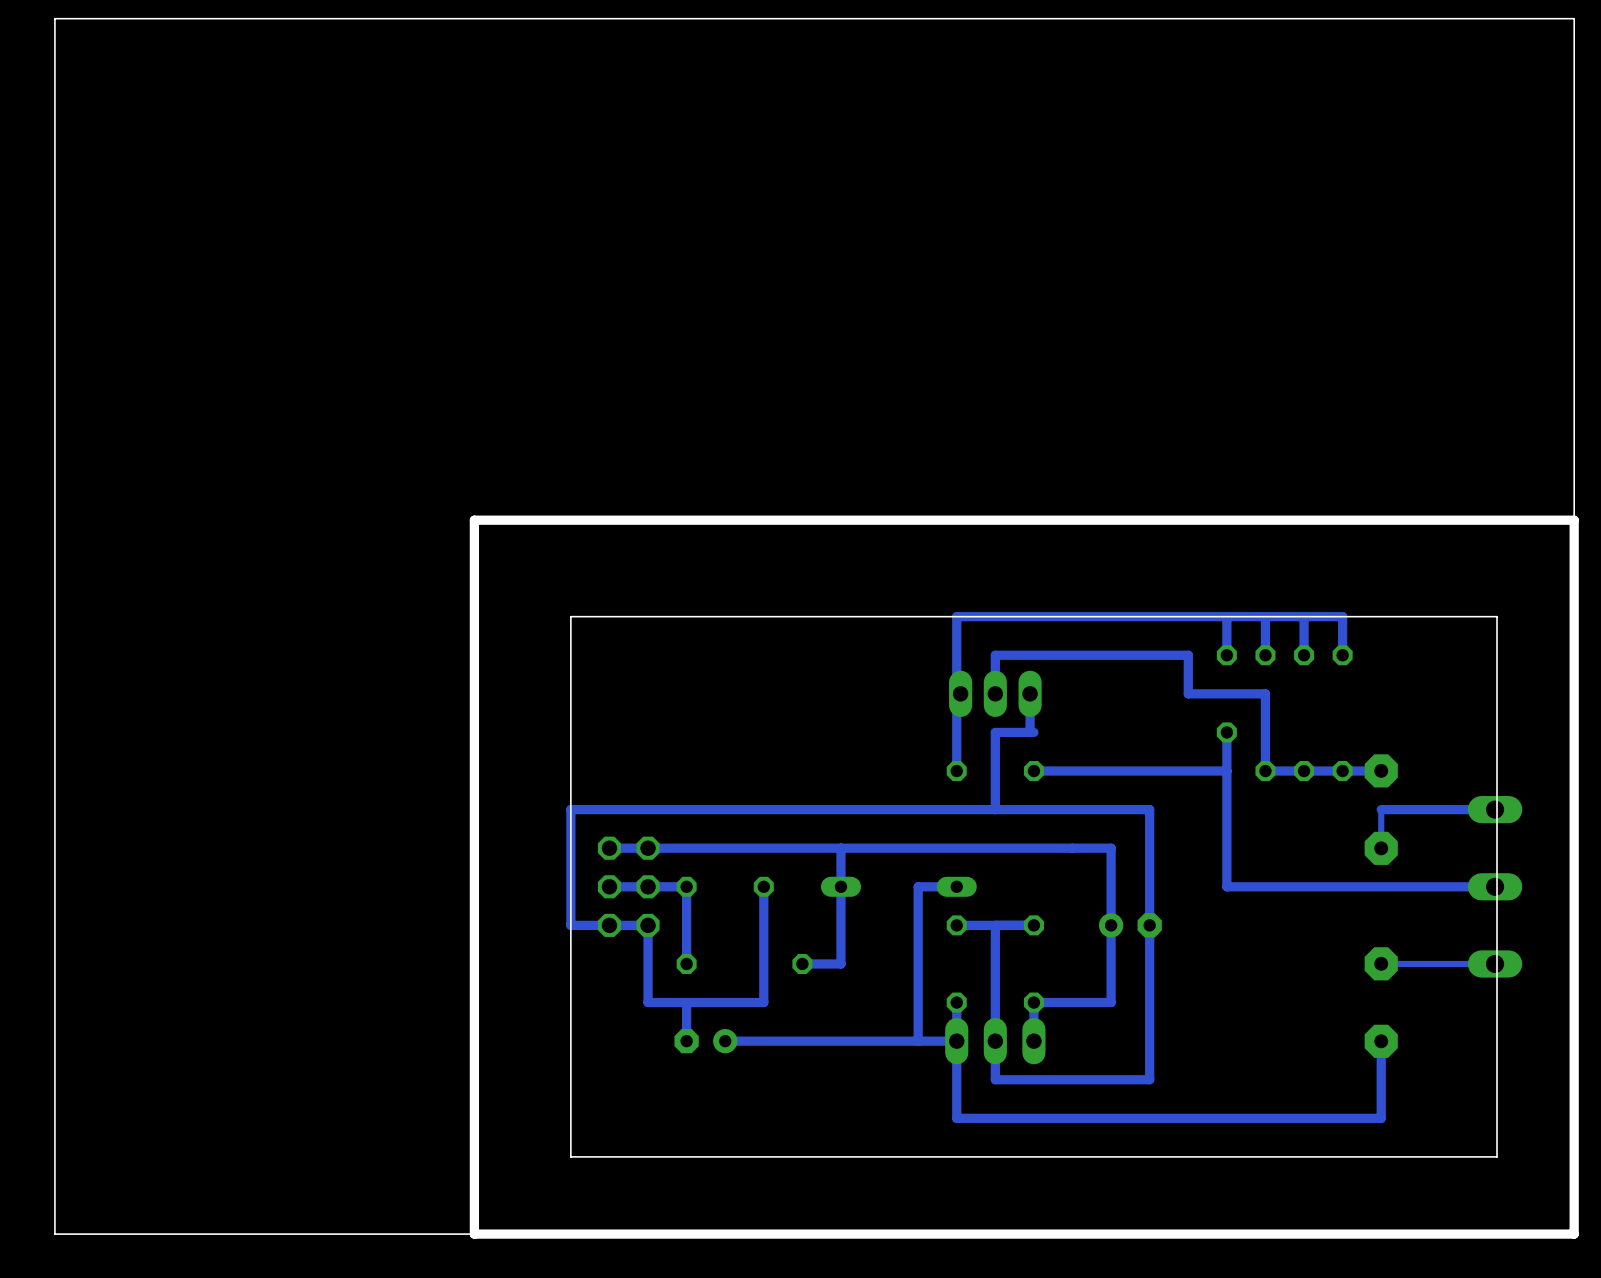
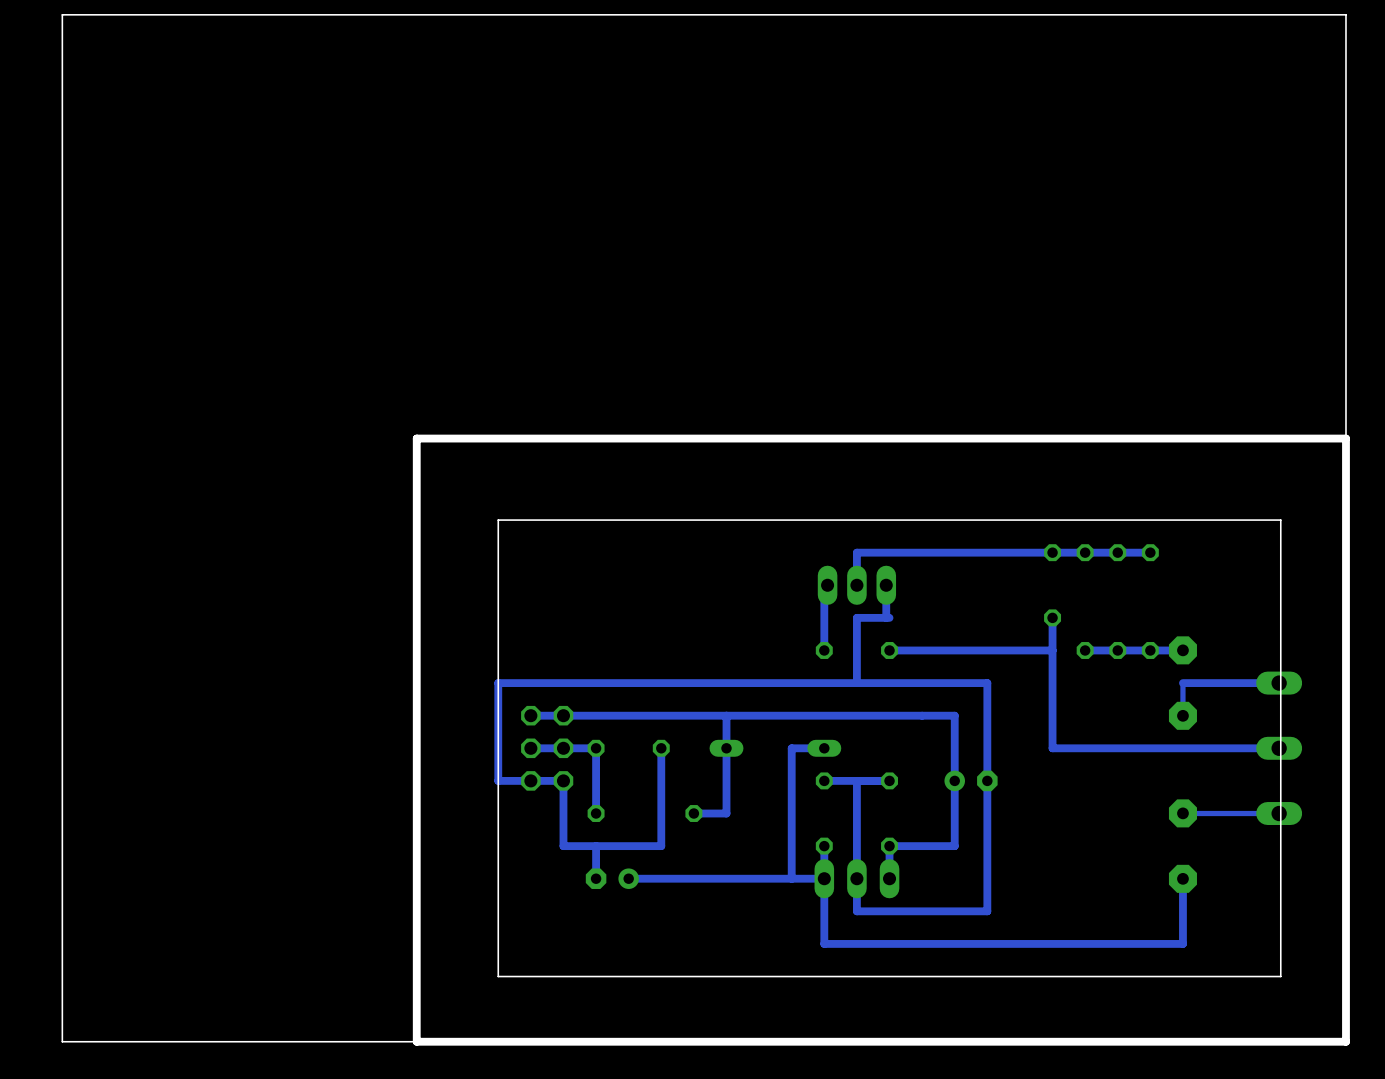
track: (1226, 616) (1226, 655) -> none
track: (1265, 616) (1265, 655) -> none
track: (1304, 616) (1304, 655) -> none
track: (1188, 655) (1188, 693) (1265, 693) (1265, 771) -> (1019, 552) (1150, 552)
track: (1342, 655) (1342, 616) (956, 616) (956, 693) (960, 693) -> none

